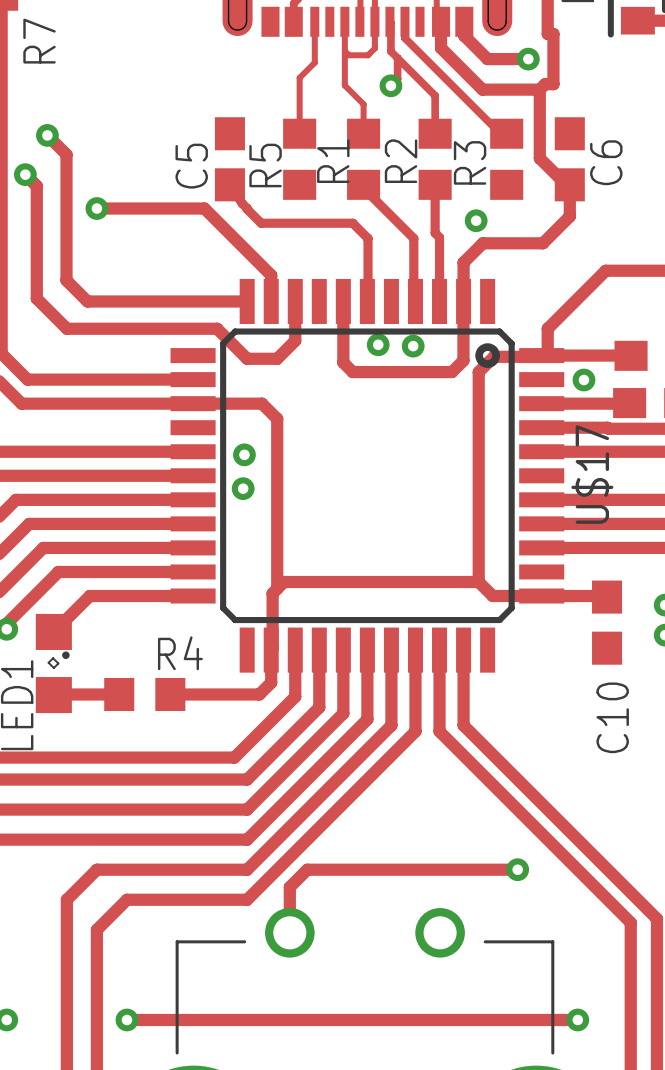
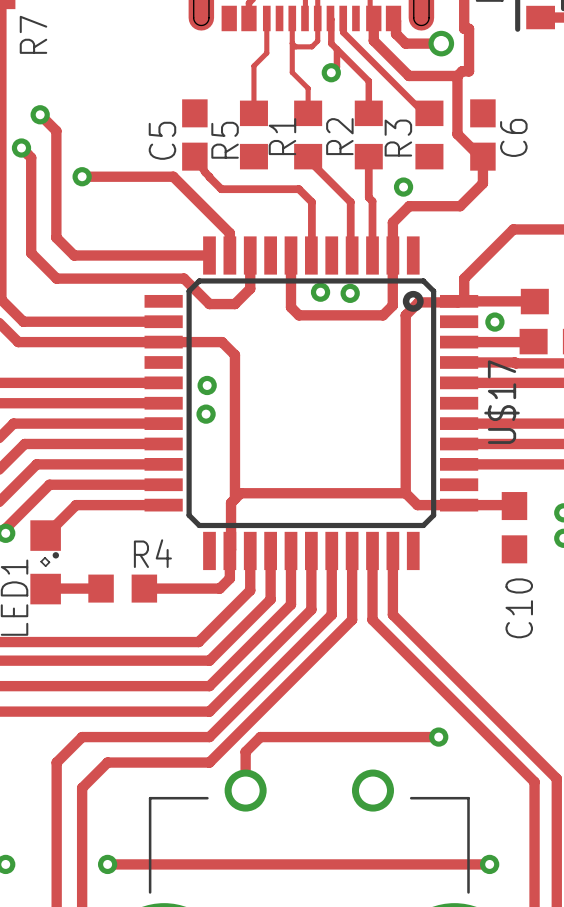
track: none -> (393, 18) (396, 20) (396, 33) (405, 43) (441, 43)
track: (464, 35) (487, 59) (528, 59) -> none
via size: [516, 47, 540, 71] -> [428, 30, 455, 57]

